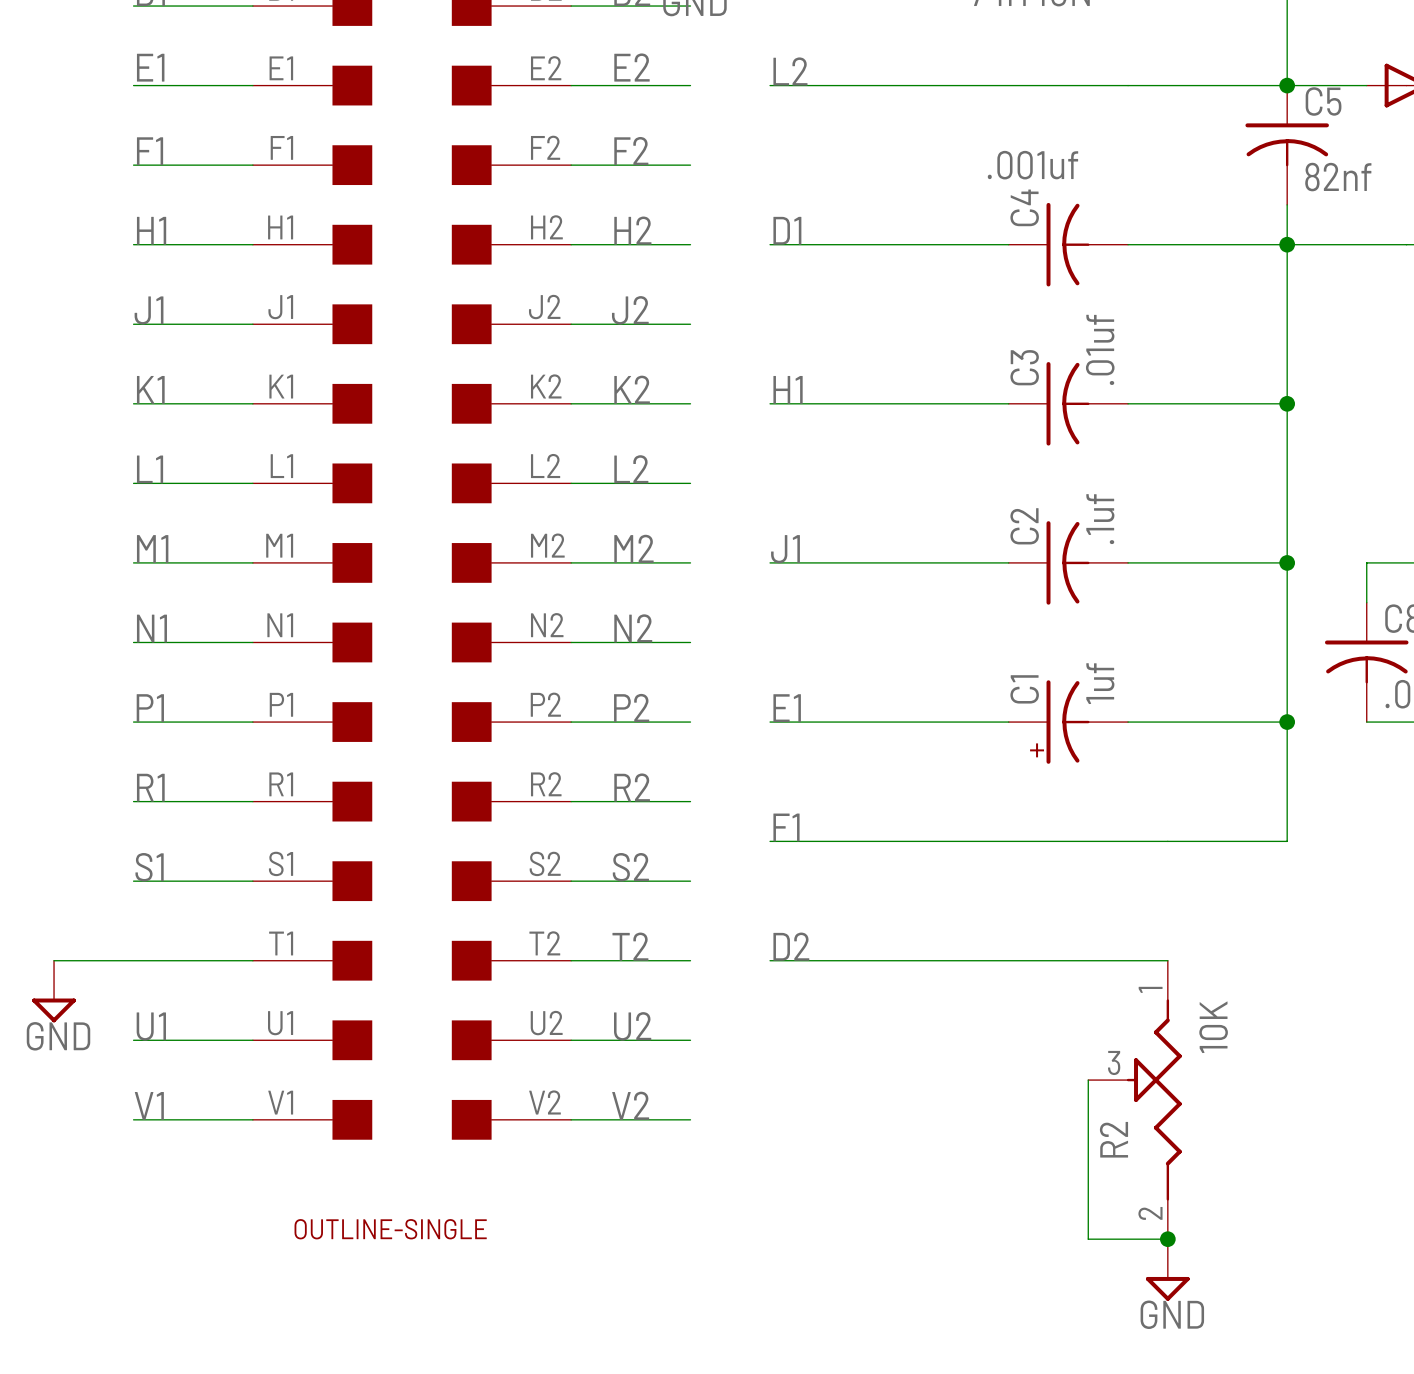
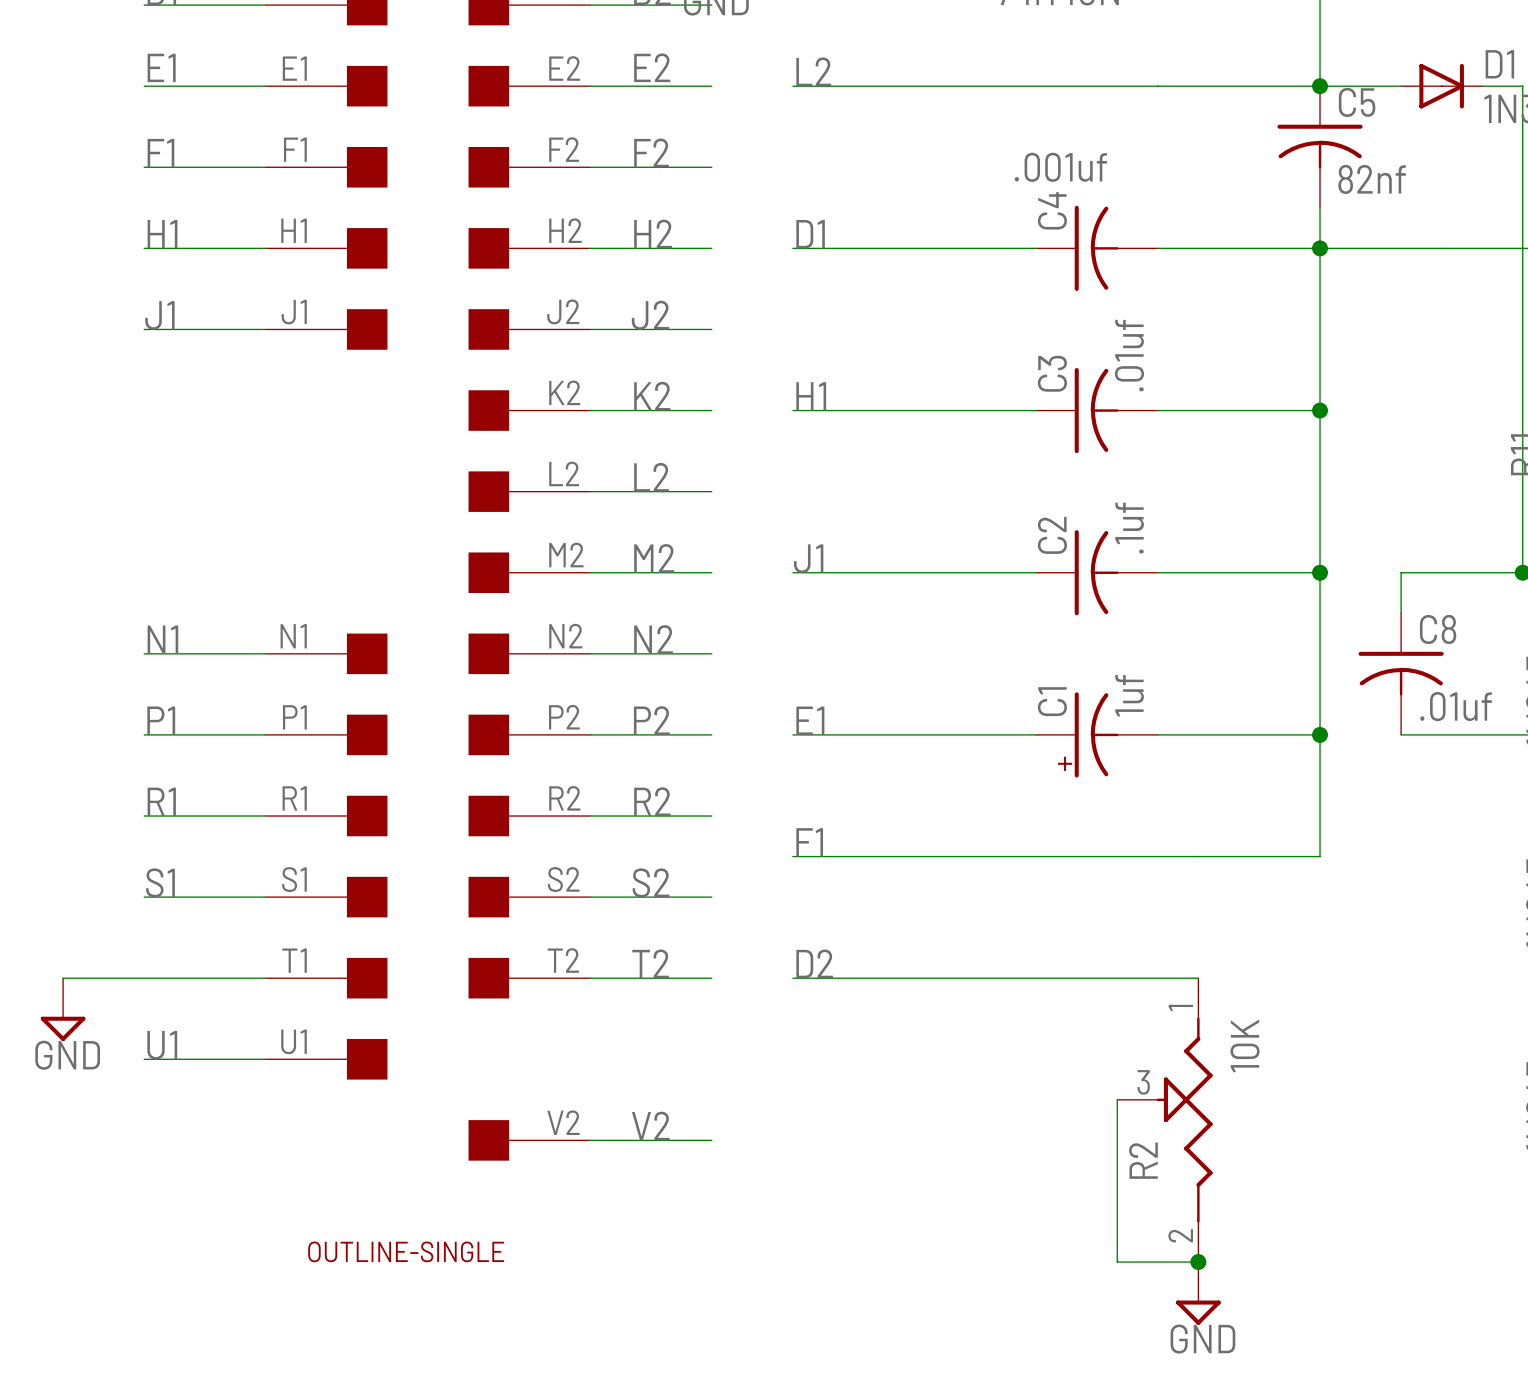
label: K1 (150, 389) -> none
wire: (133, 403) (252, 403) -> none
part: (312, 403) -> none
label: L1 (150, 469) -> none
wire: (133, 483) (252, 483) -> none
part: (312, 483) -> none
label: M1 (152, 549) -> none
wire: (133, 562) (252, 562) -> none
part: (312, 562) -> none
label: U2 (632, 1026) -> none
part: (511, 1040) -> none
wire: (571, 1040) (690, 1040) -> none
label: V1 (149, 1105) -> none
wire: (133, 1119) (252, 1119) -> none
part: (312, 1119) -> none

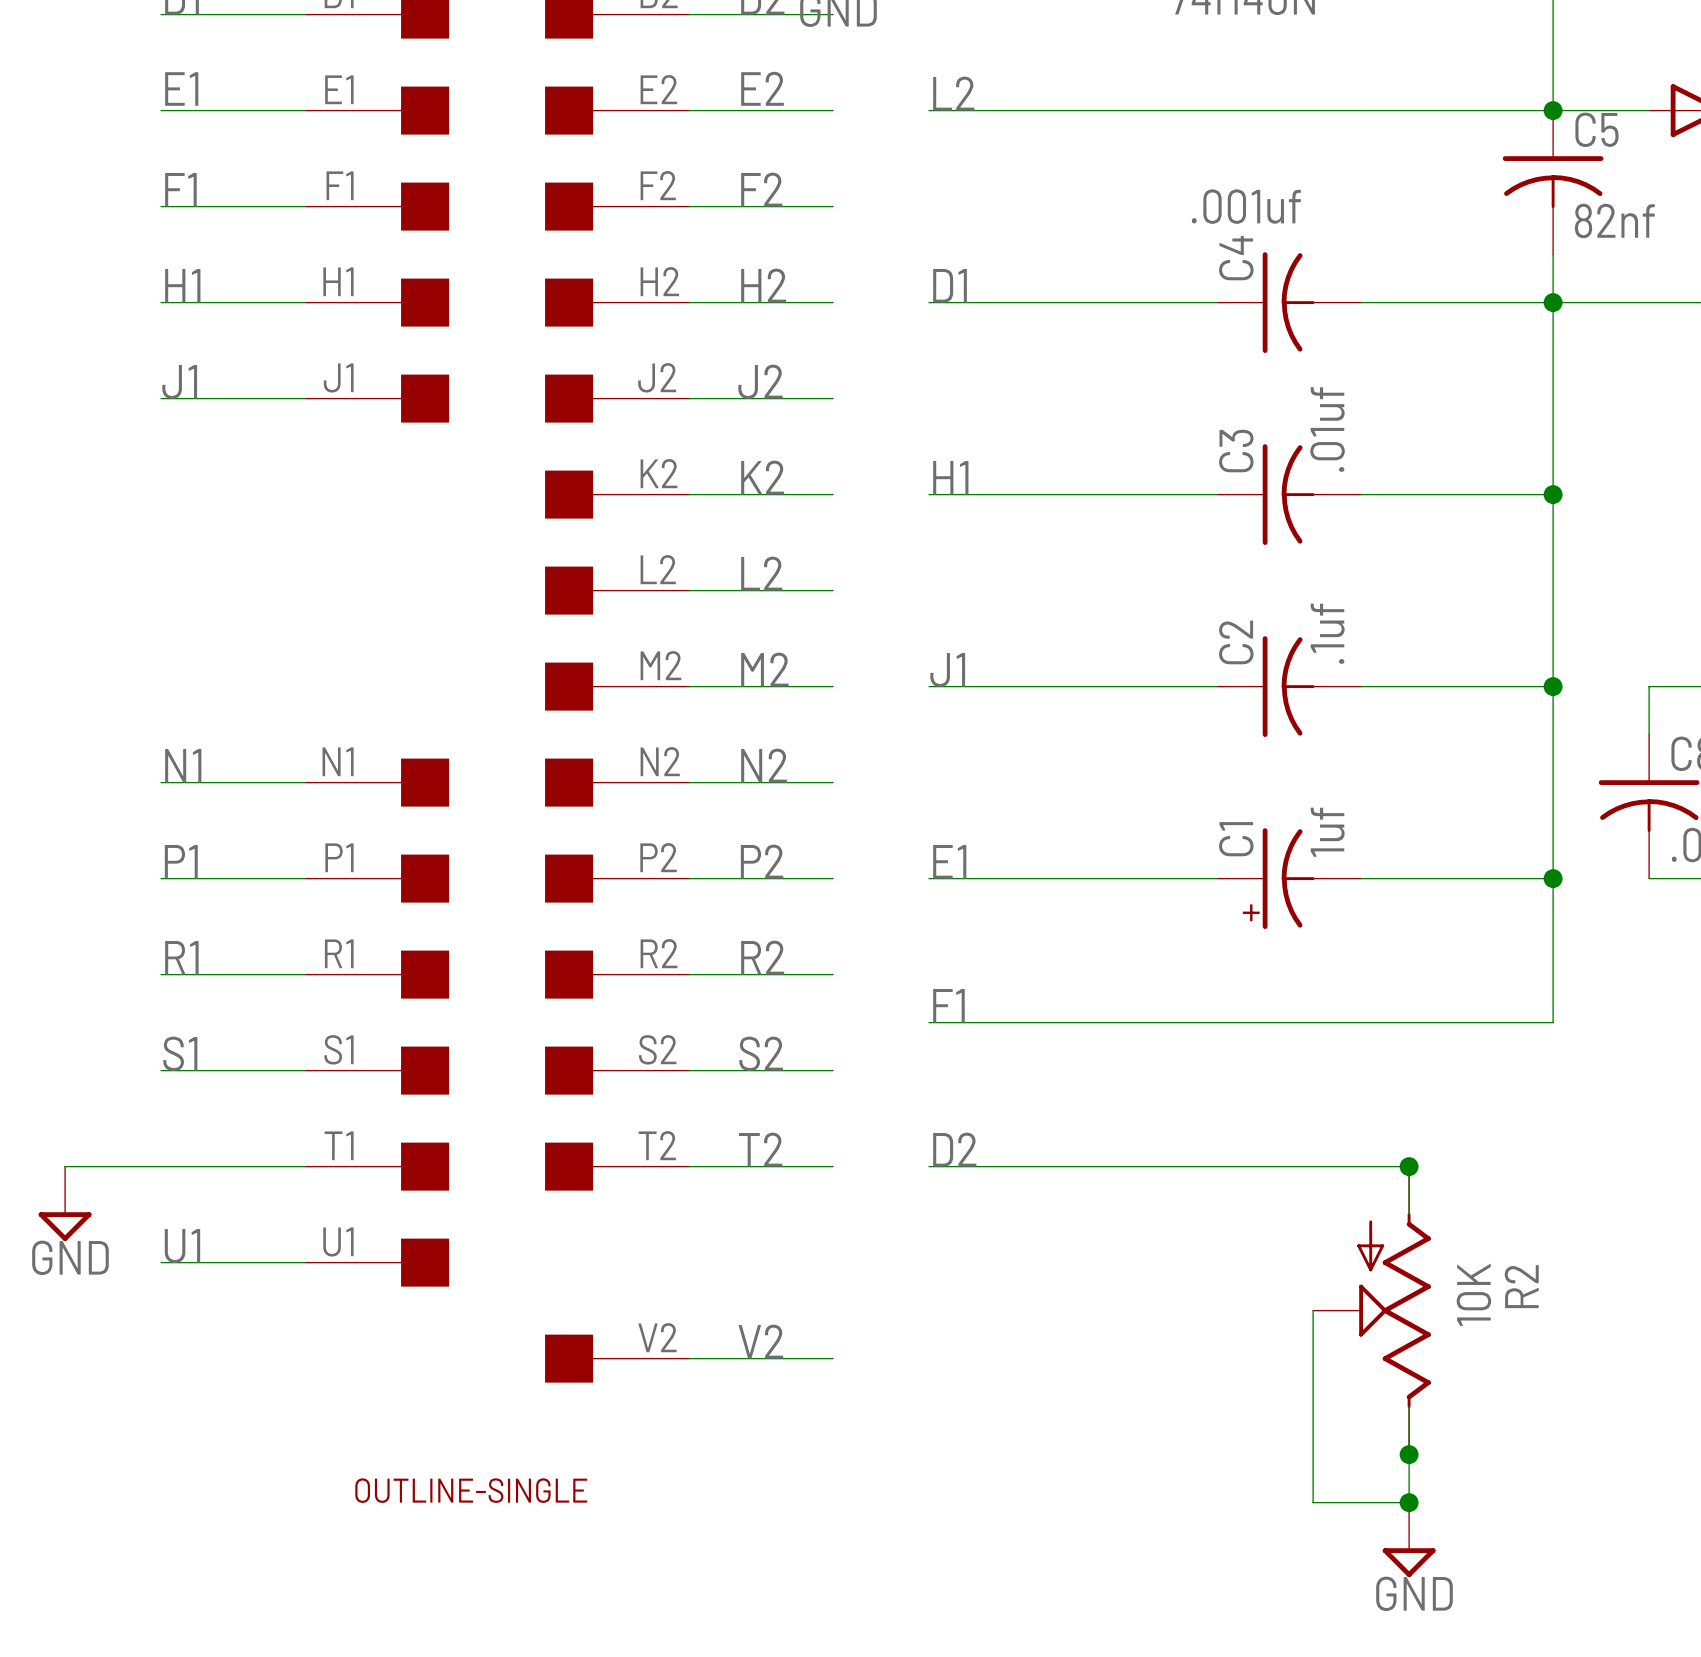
R2 symbol: [1117, 978, 1213, 1263] -> [1313, 1166, 1431, 1455]
junction: none -> (1409, 1166)
R2 value position: 10K (1245, 1046) -> 10K (1473, 1294)
R2 name position: R2 (1143, 1160) -> R2 (1521, 1286)
junction: none -> (1409, 1454)

